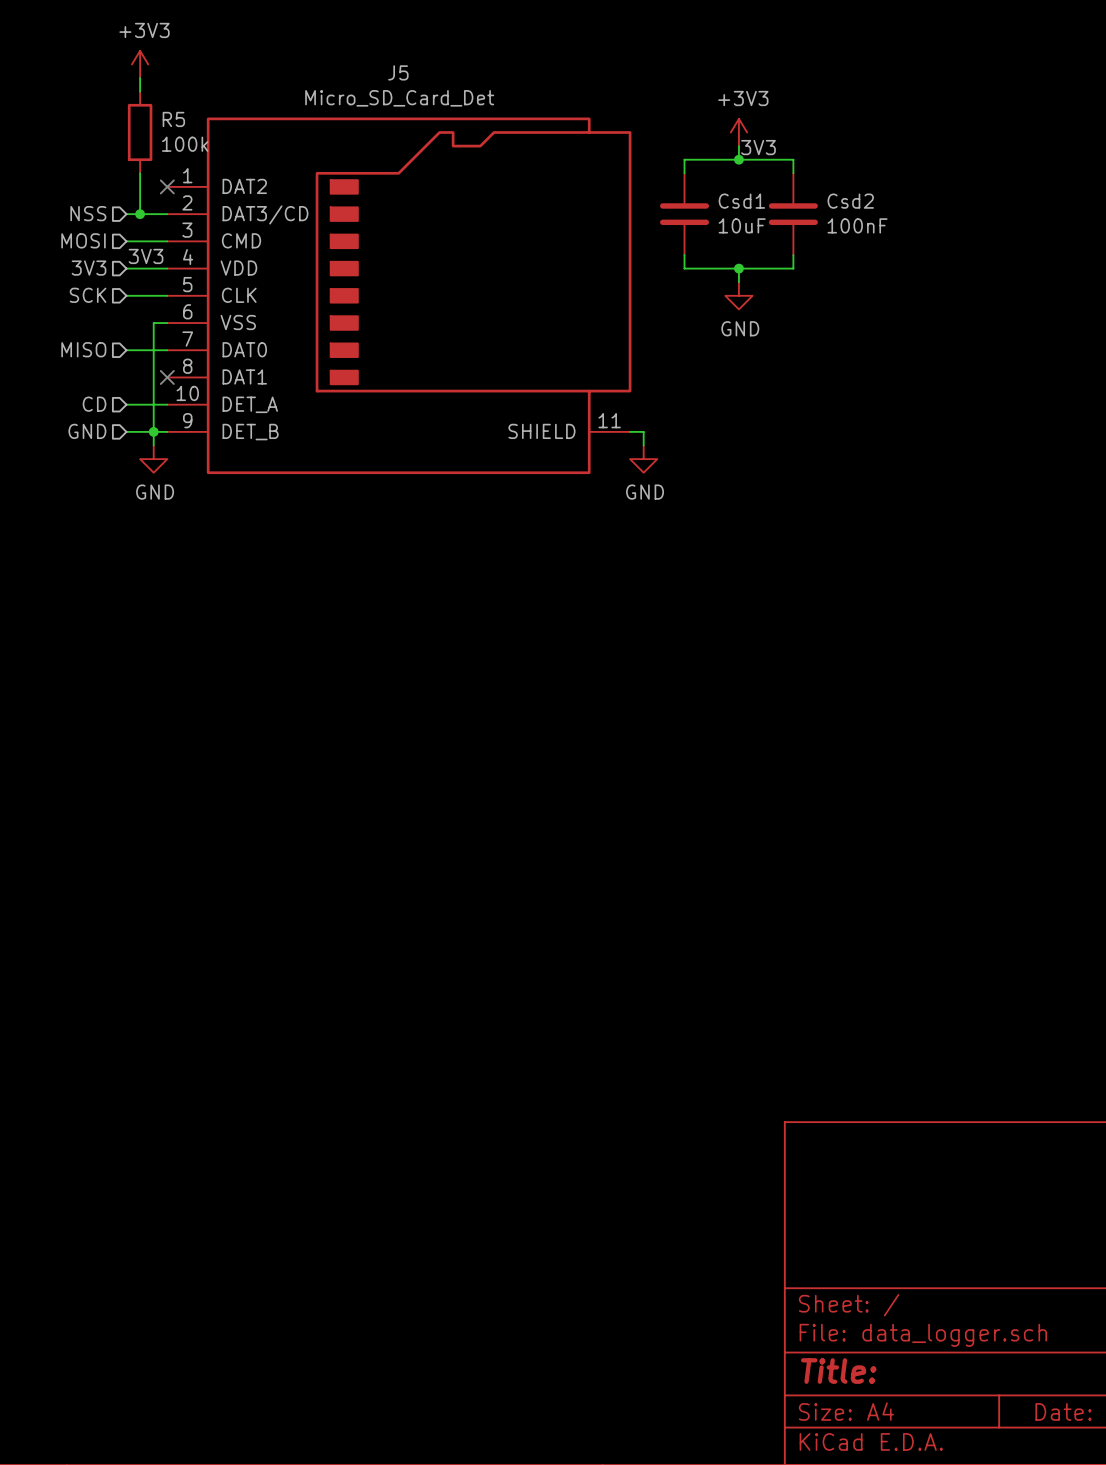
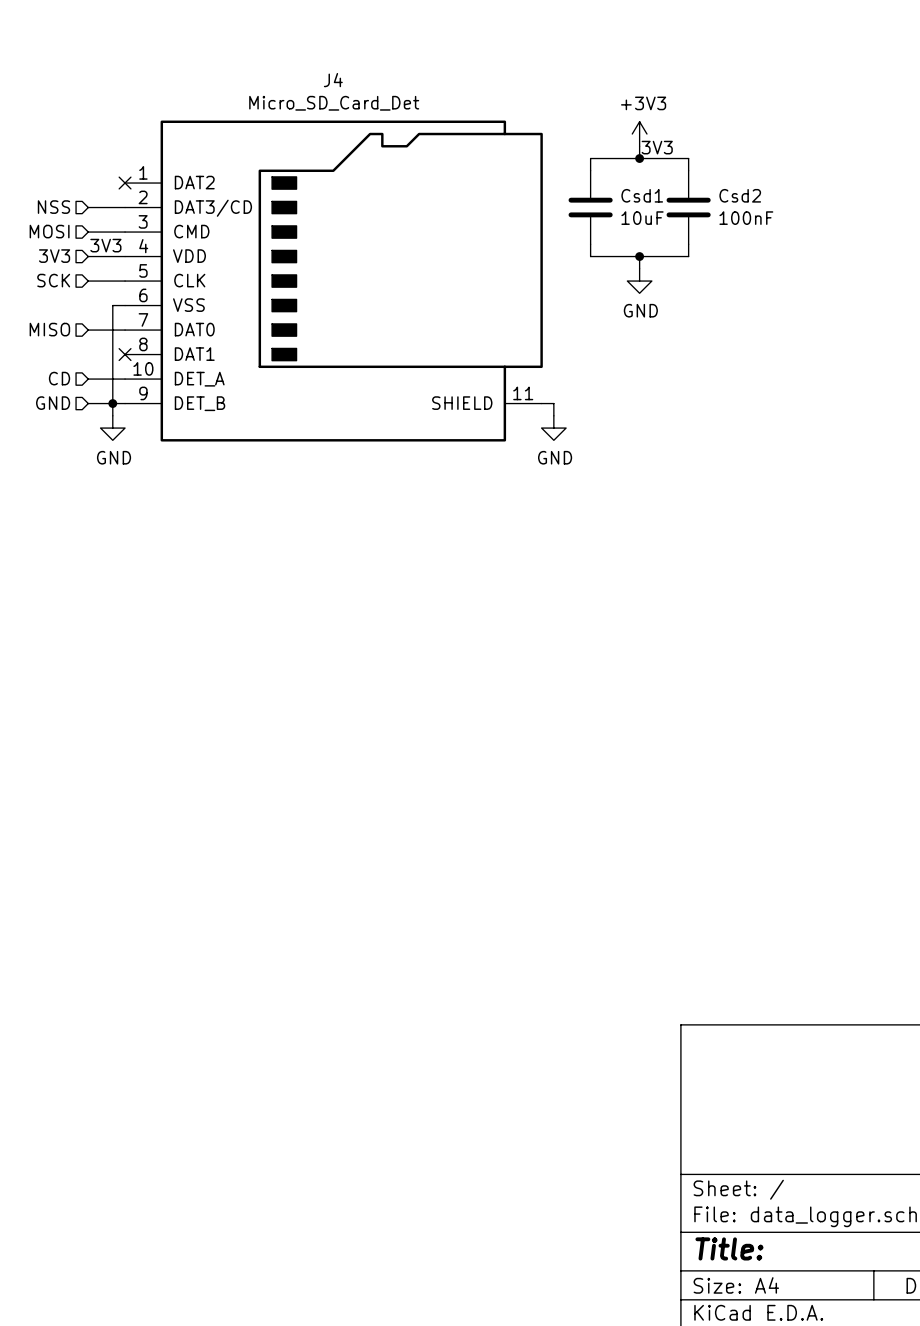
power symbol: +3V3 (140, 64) -> none
J5 name: J5 (398, 72) -> J4 (333, 80)
wire: (140, 78) (140, 91) -> none
R5: 100k (140, 132) -> none
wire: (140, 173) (140, 214) -> none
junction: (140, 214) -> none

